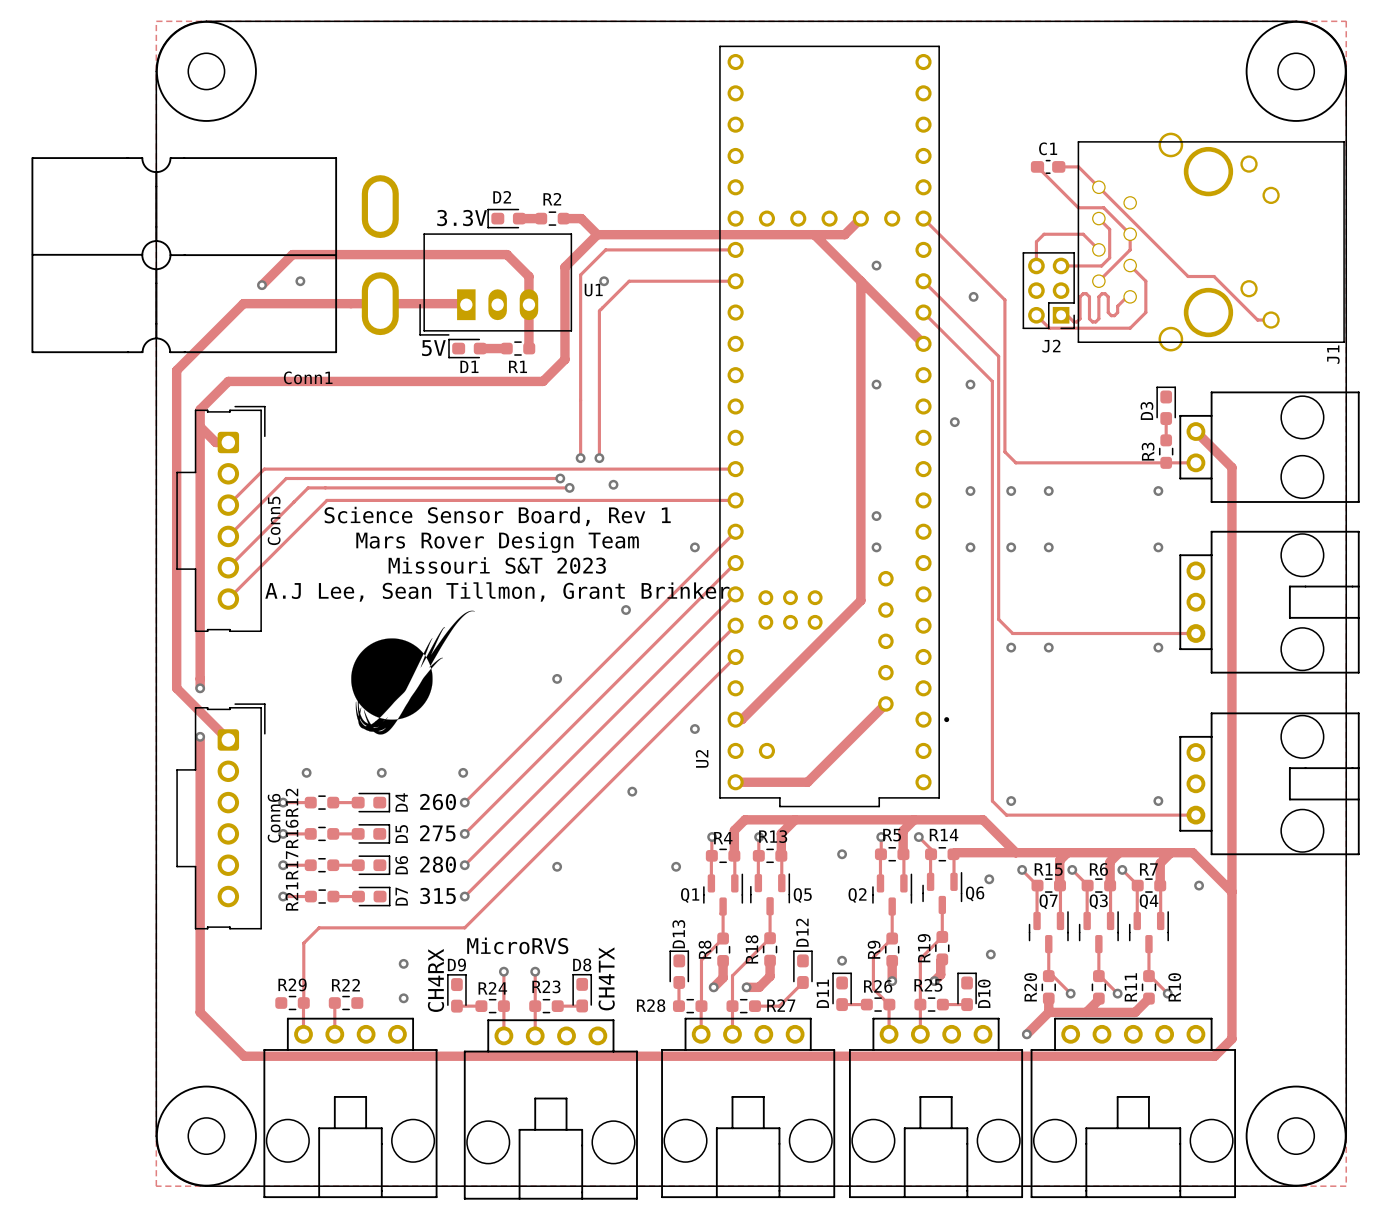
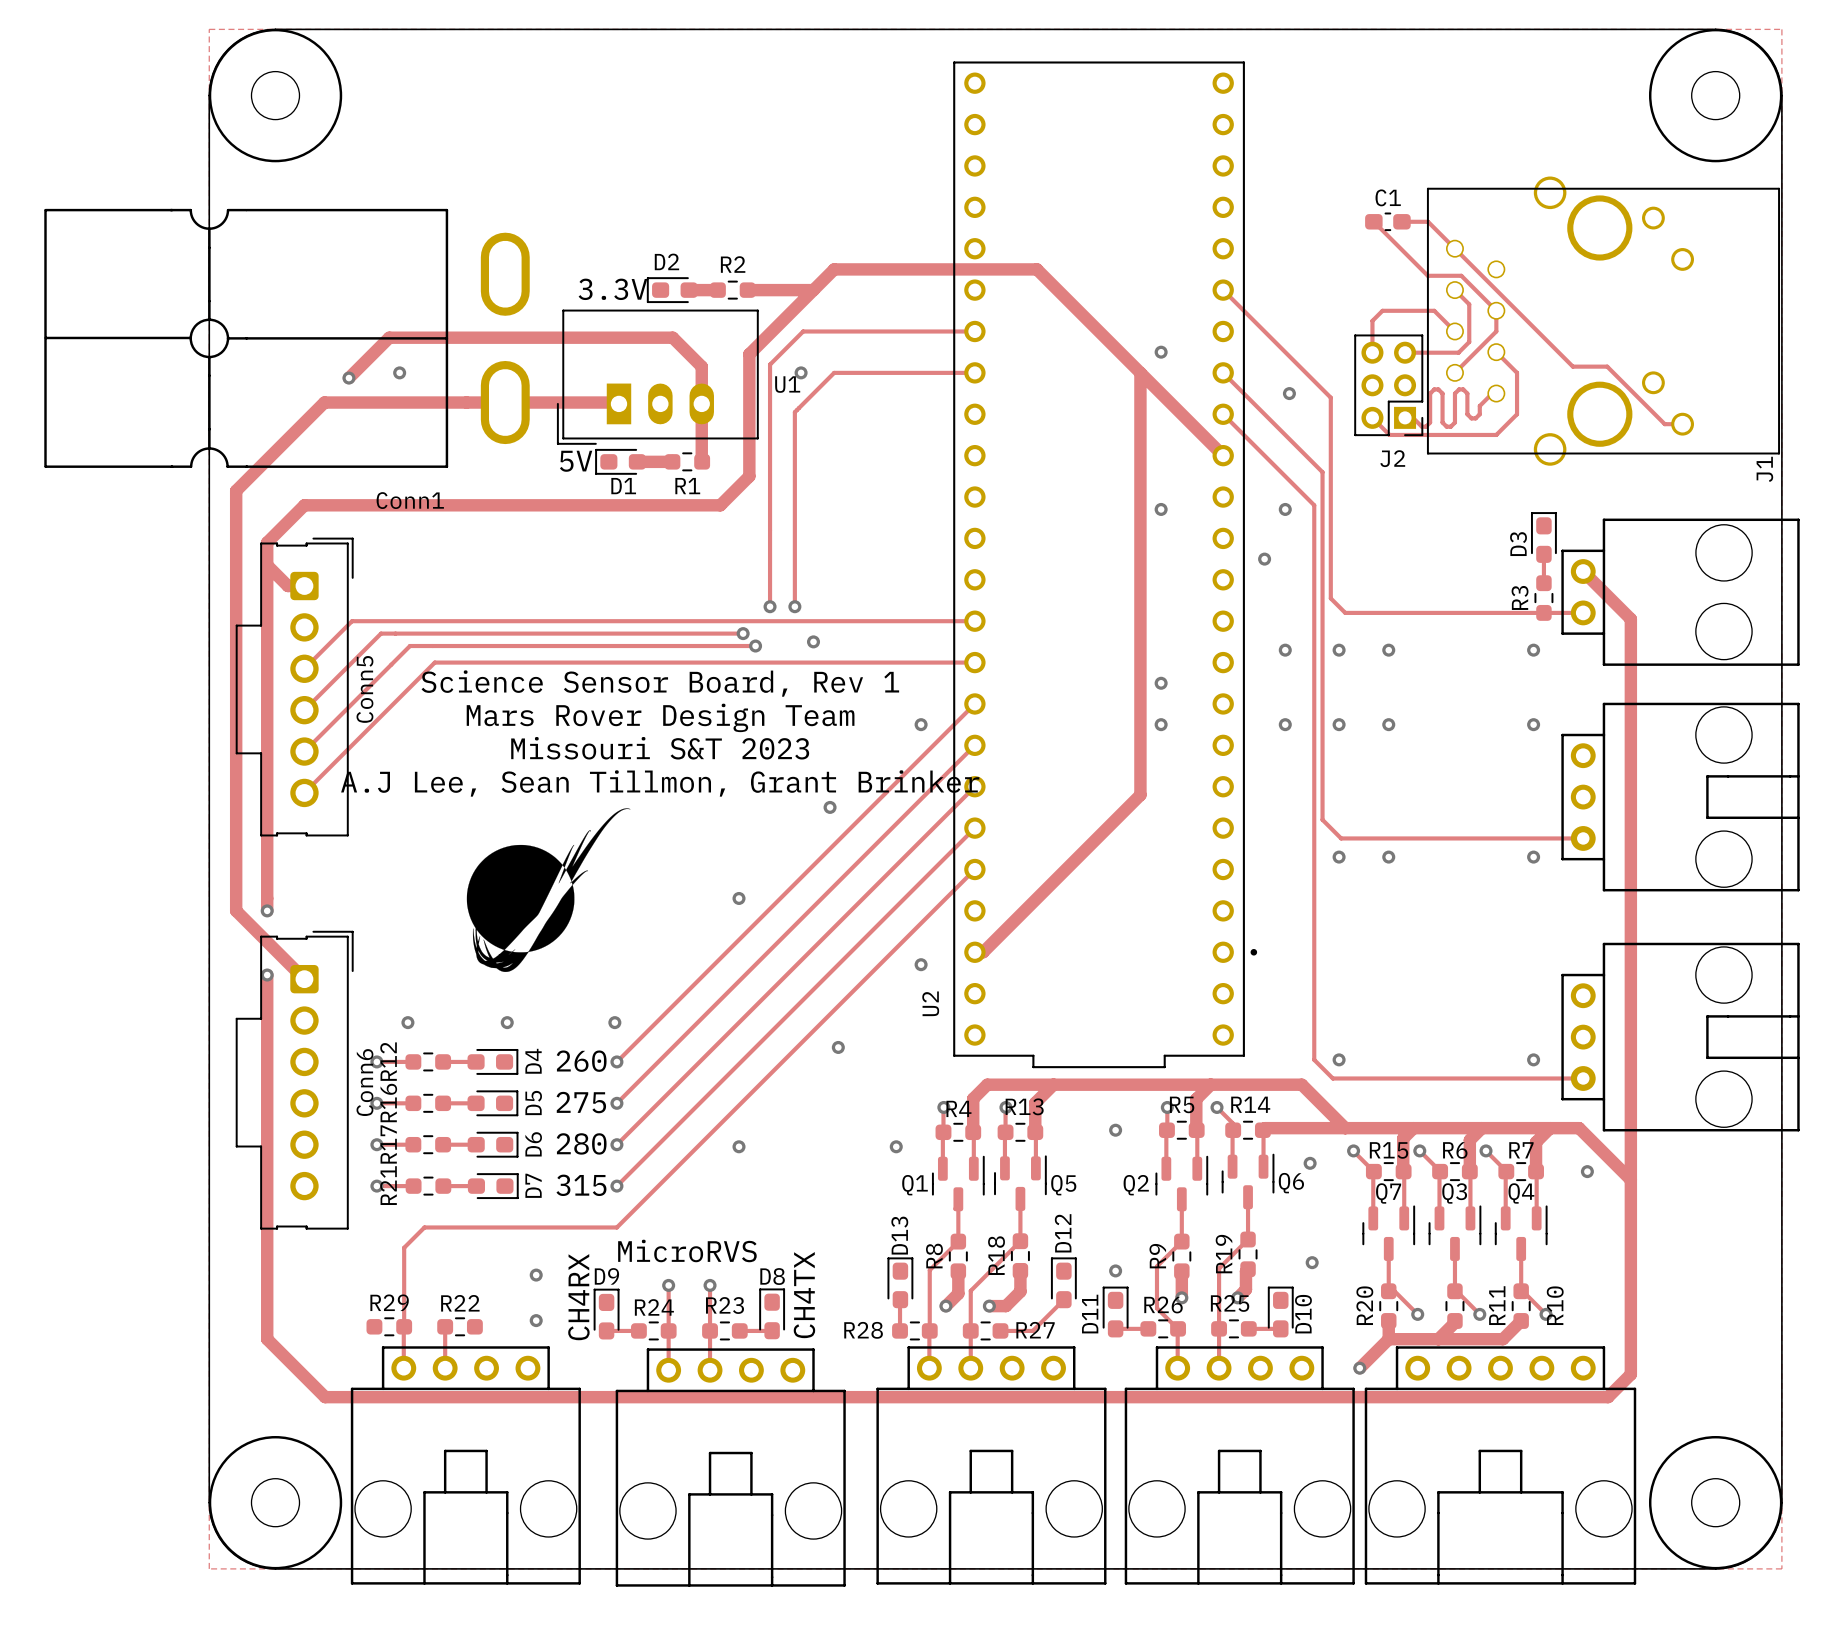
U2 footprint: [719, 45, 950, 808] -> [953, 61, 1258, 1069]
track: (581, 218) (597, 234) (844, 234) (860, 218) -> (770, 290) (813, 290)
track: none -> (792, 311) (834, 269) (1036, 269) (1078, 311)
track: (885, 703) (807, 782) (735, 782) -> none

